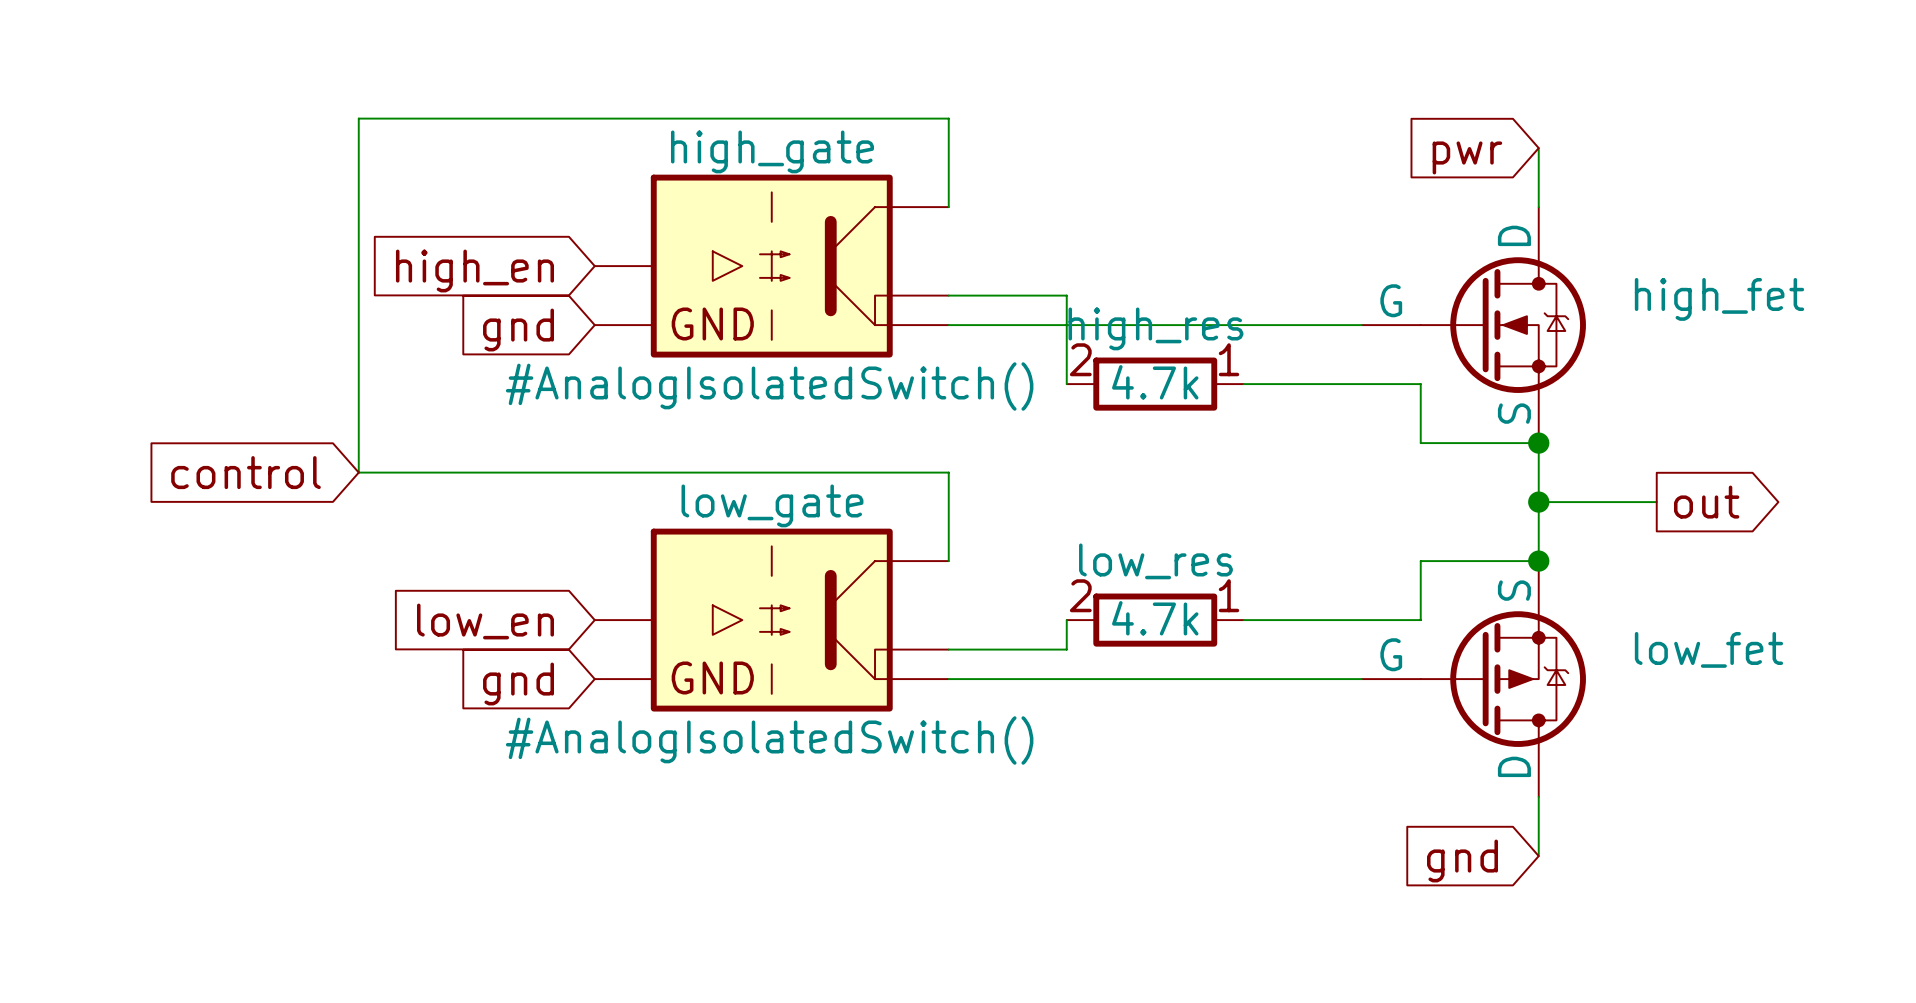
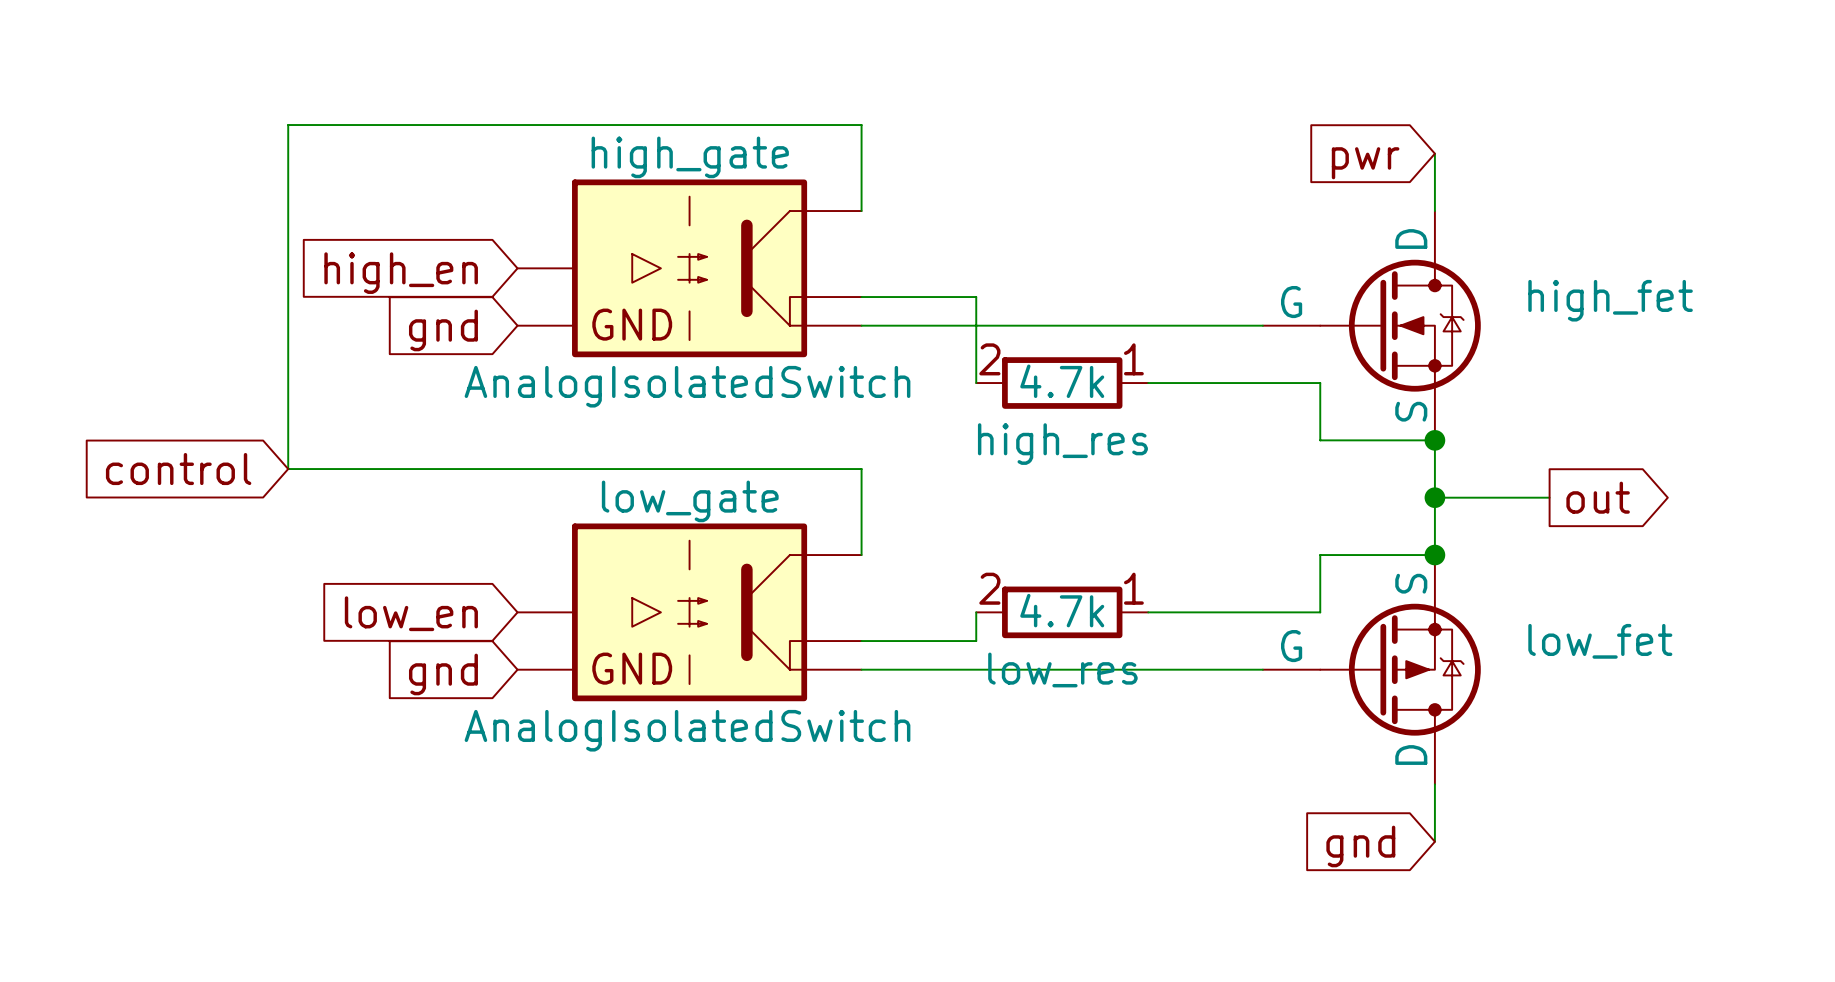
high_res name position: high_res (1155, 328) -> high_res (1062, 444)
high_gate value: #AnalogIsolatedSwitch() (769, 386) -> AnalogIsolatedSwitch (687, 386)
low_res name position: low_res (1155, 561) -> low_res (1062, 669)
low_gate value: #AnalogIsolatedSwitch() (769, 740) -> AnalogIsolatedSwitch (687, 730)

